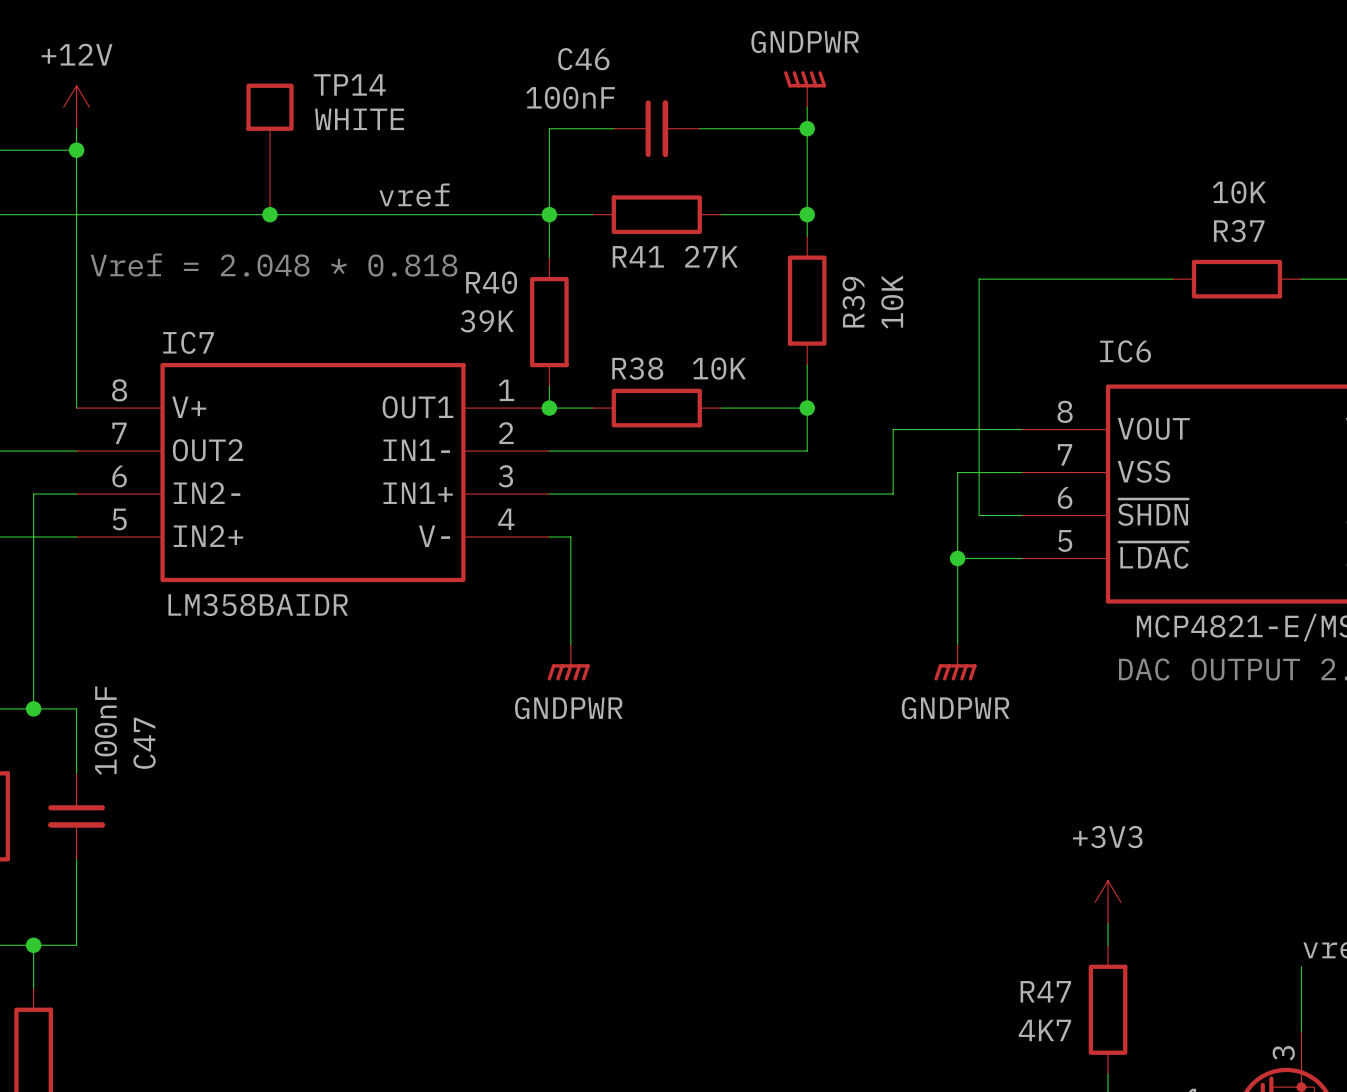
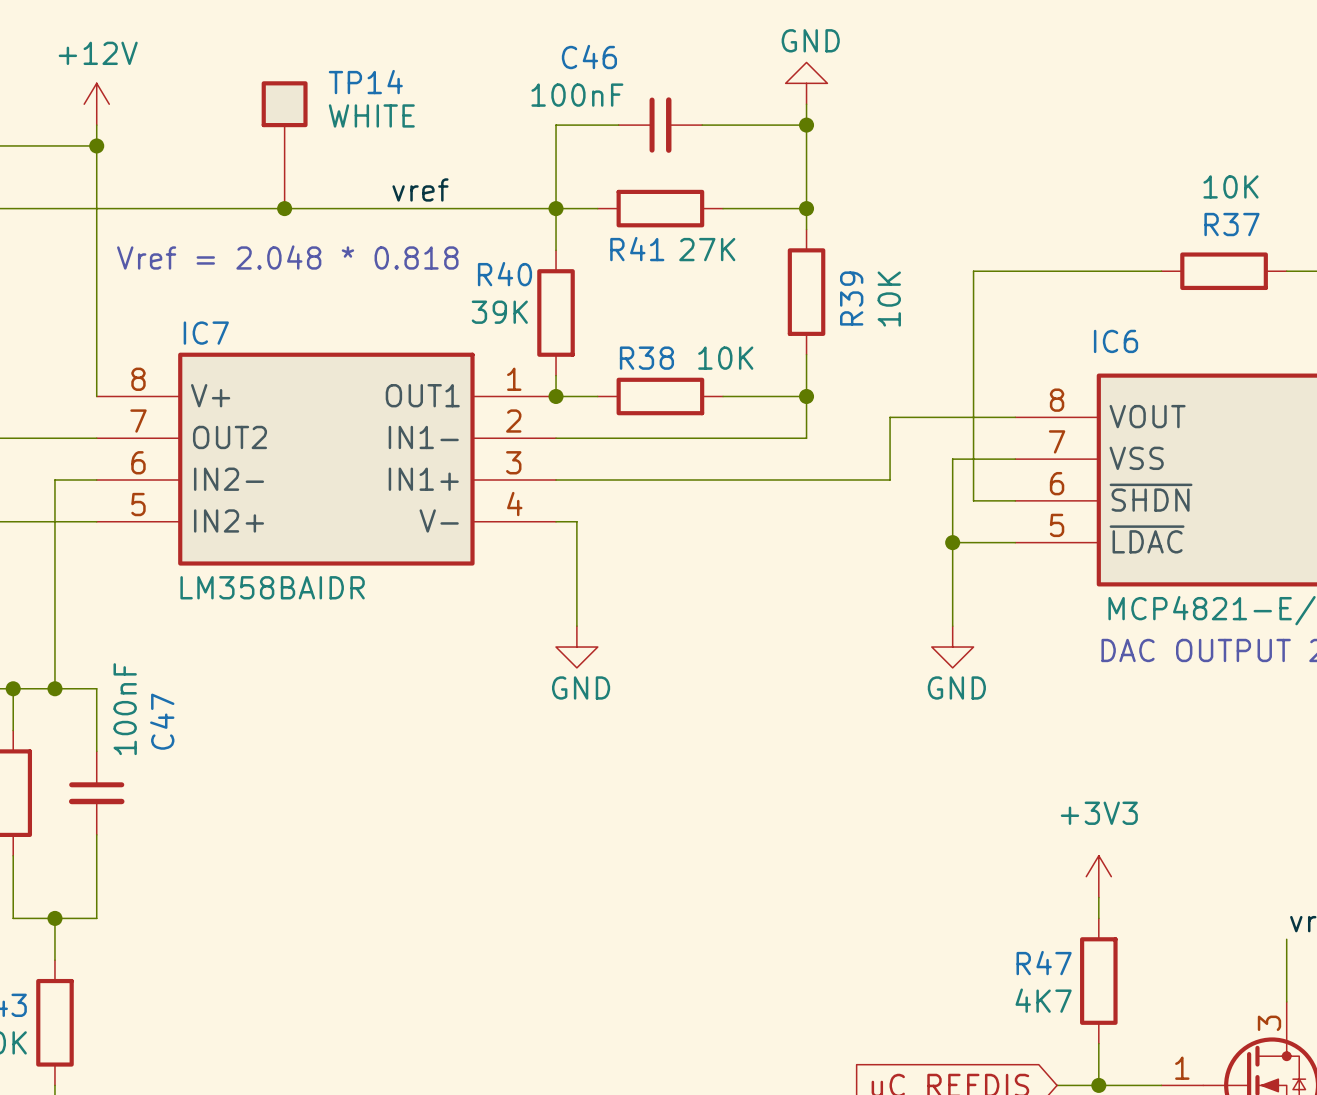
power symbol: GNDPWR (805, 89) -> GND (806, 83)
power symbol: GNDPWR (568, 662) -> GND (576, 647)
power symbol: GNDPWR (955, 662) -> GND (952, 647)

